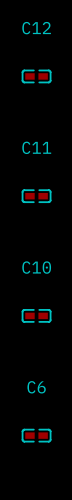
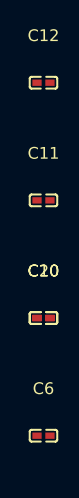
part: none -> (43, 318)

